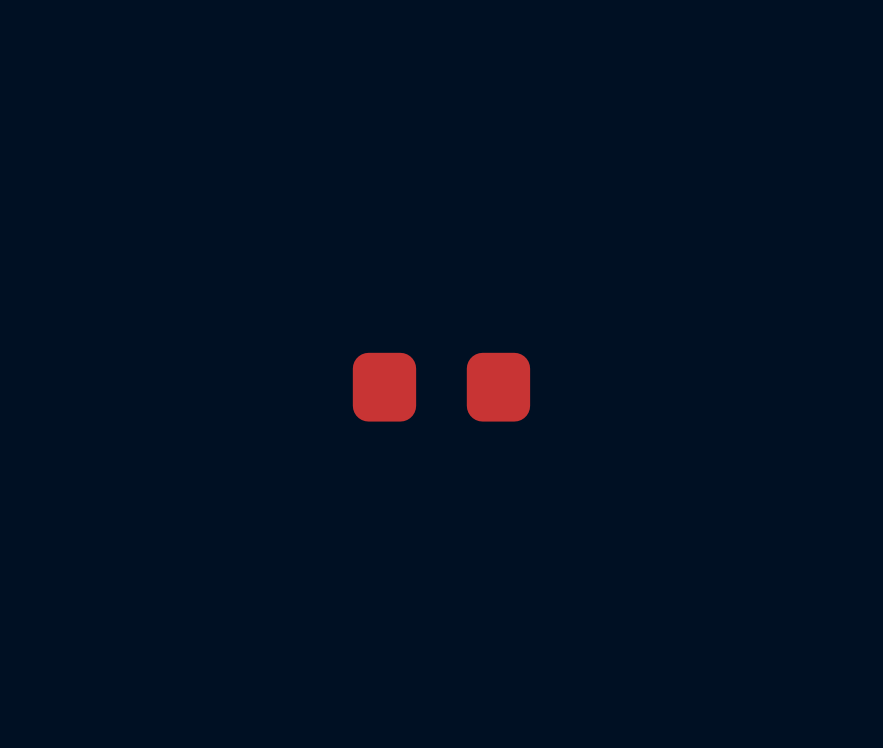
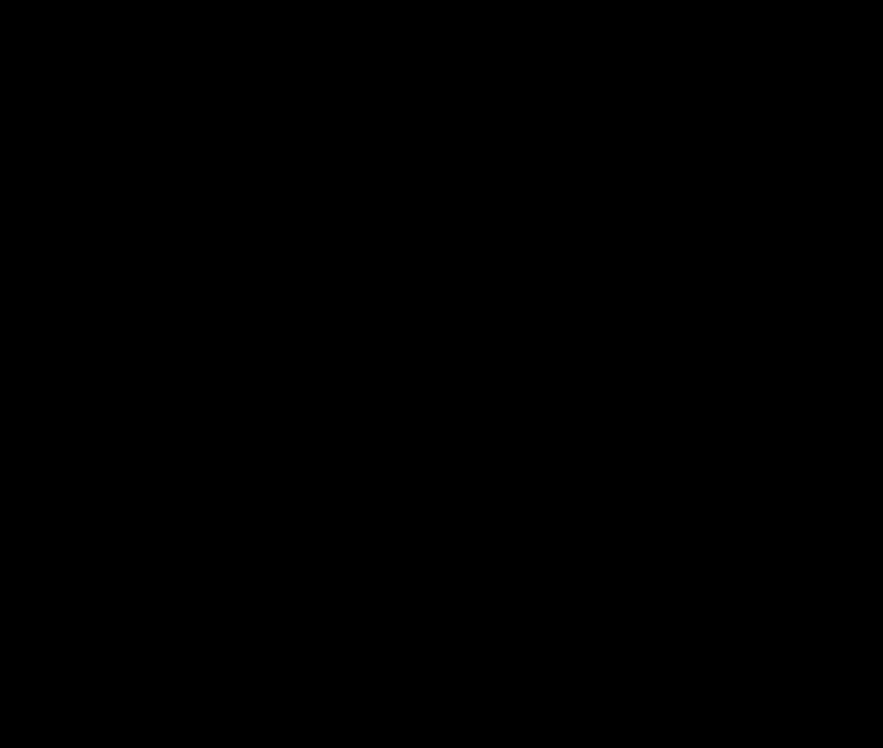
part: (441, 387) -> none

